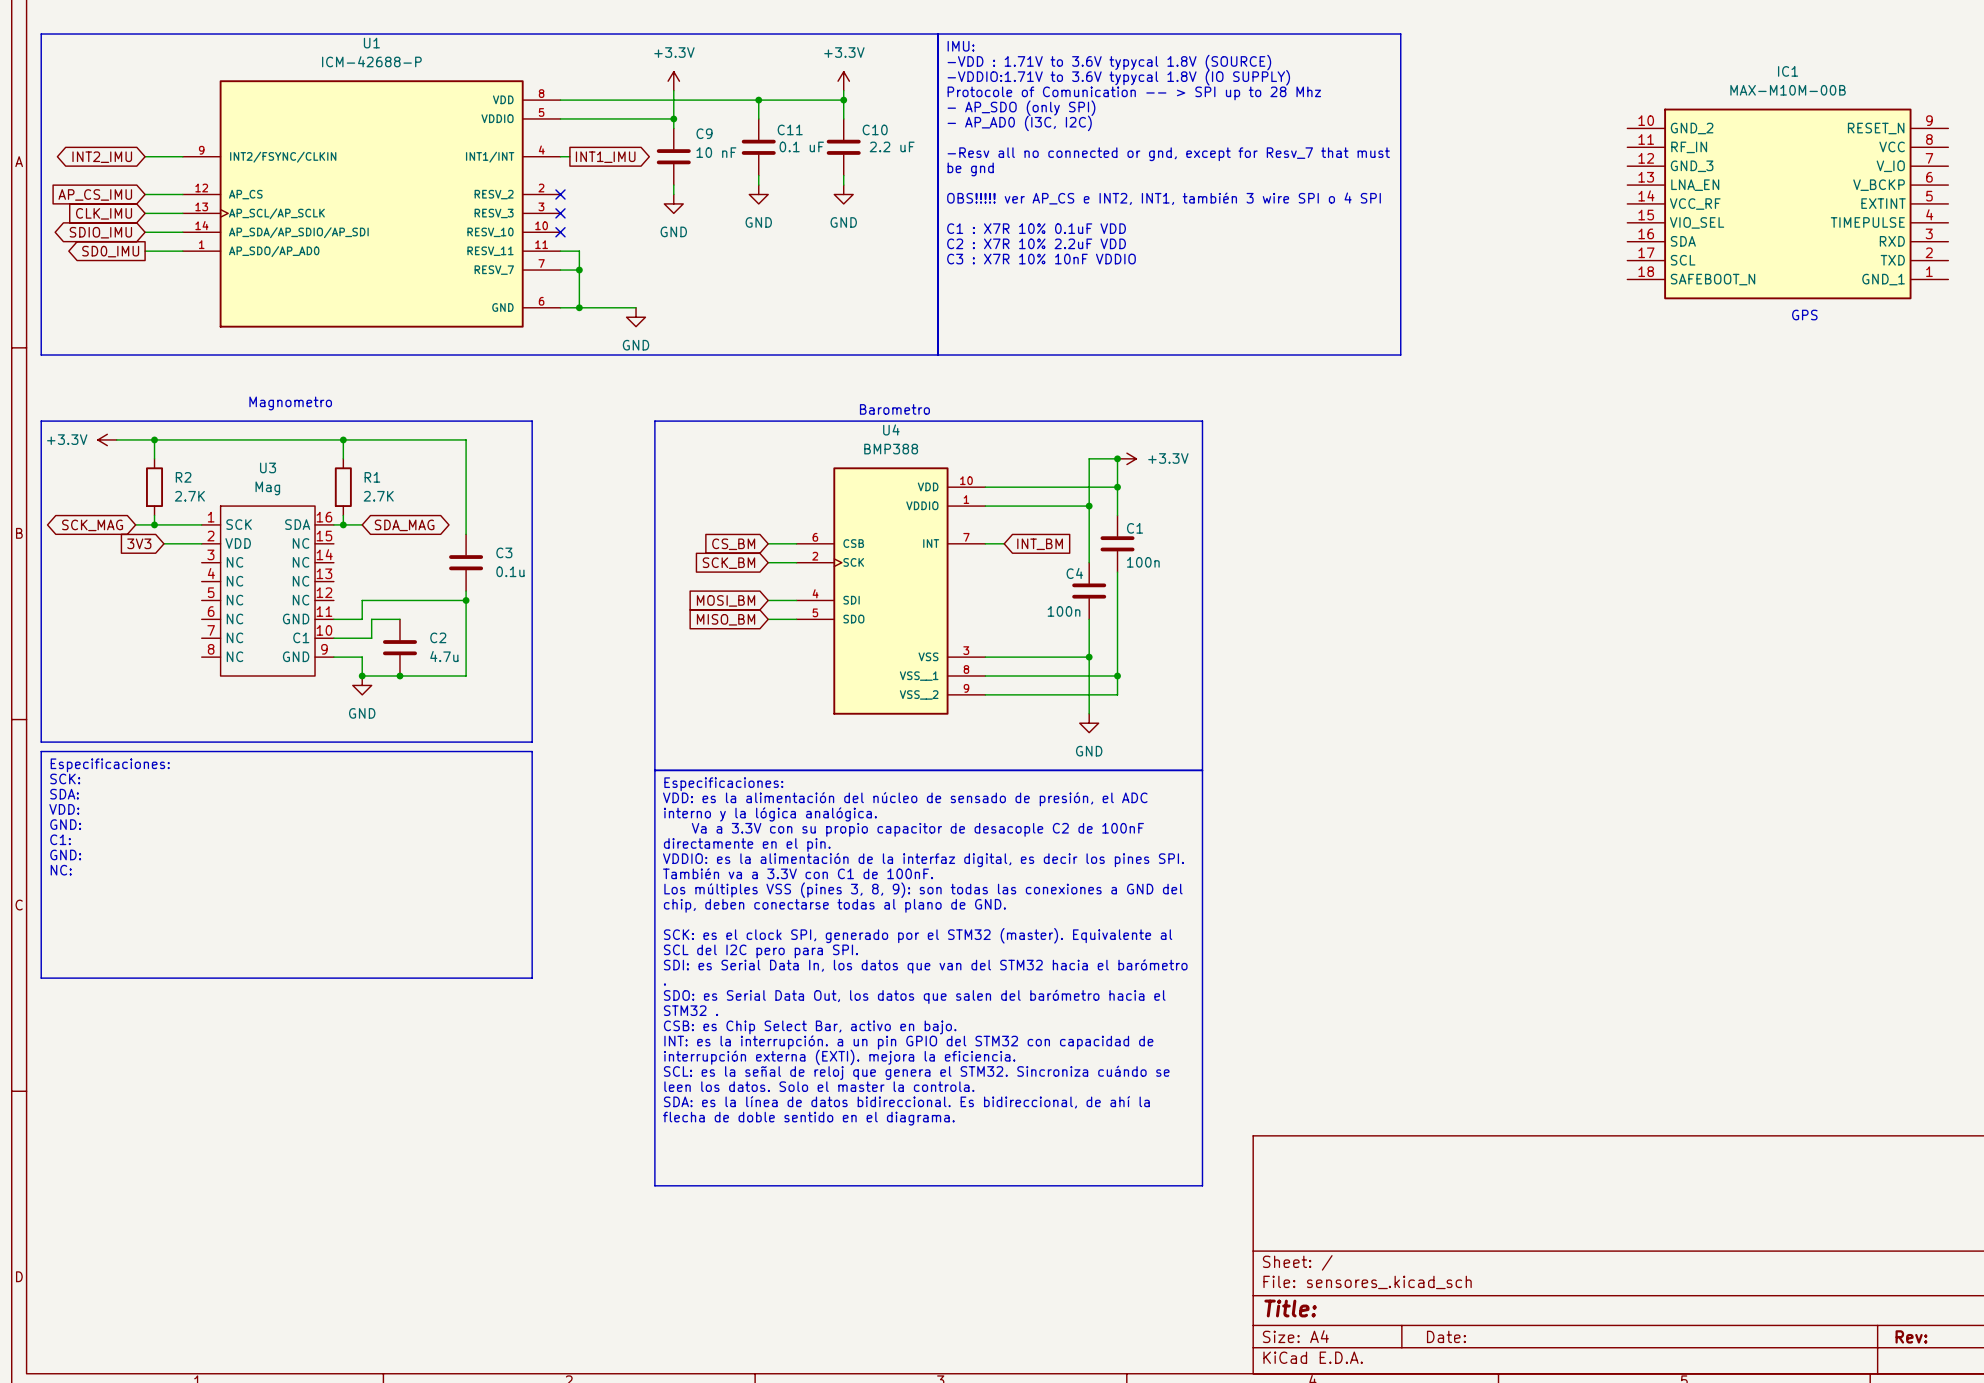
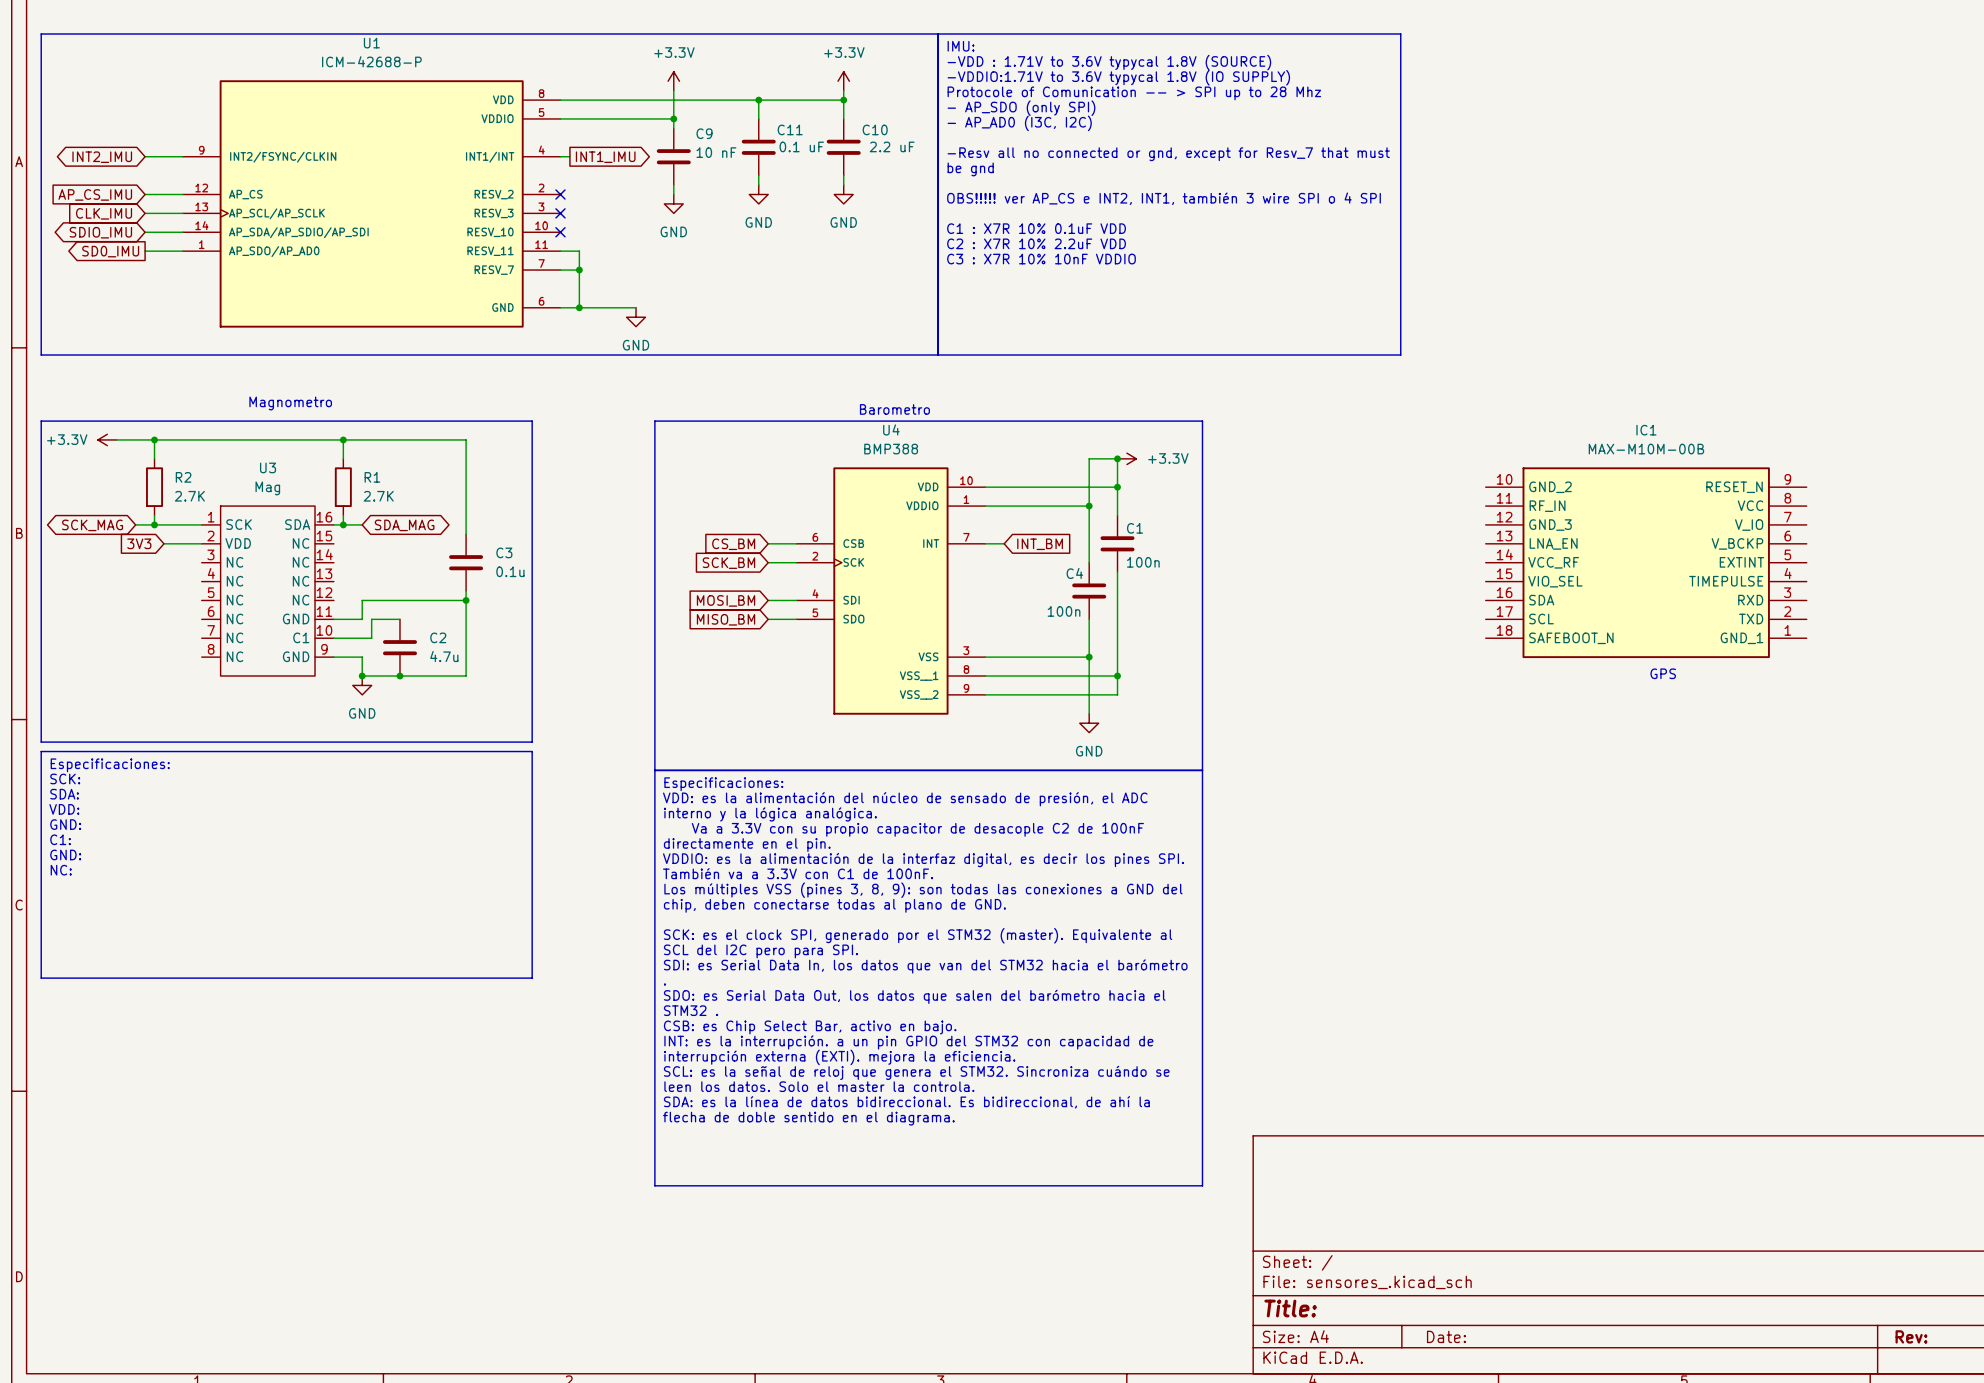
IC1 position: (1787, 203) -> (1646, 562)
text: GPS (1804, 315) -> none
text: none -> GPS (1663, 673)

